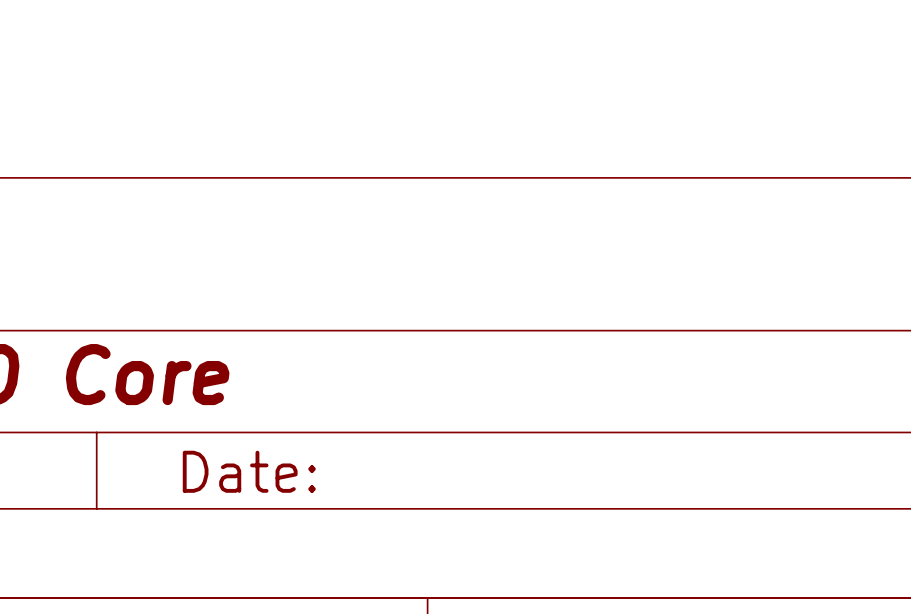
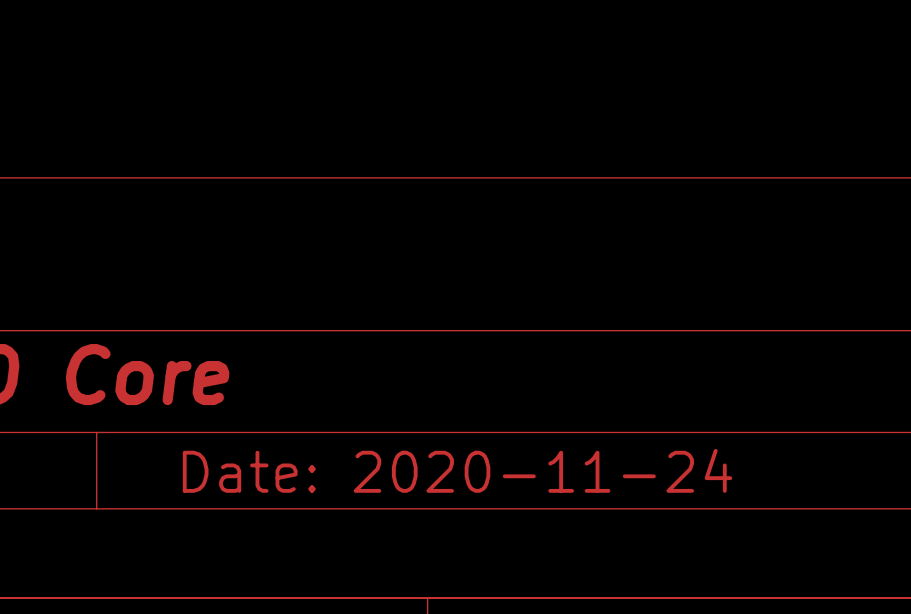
title block: Date: (249, 471) -> Date: 2020-11-24 (457, 470)

